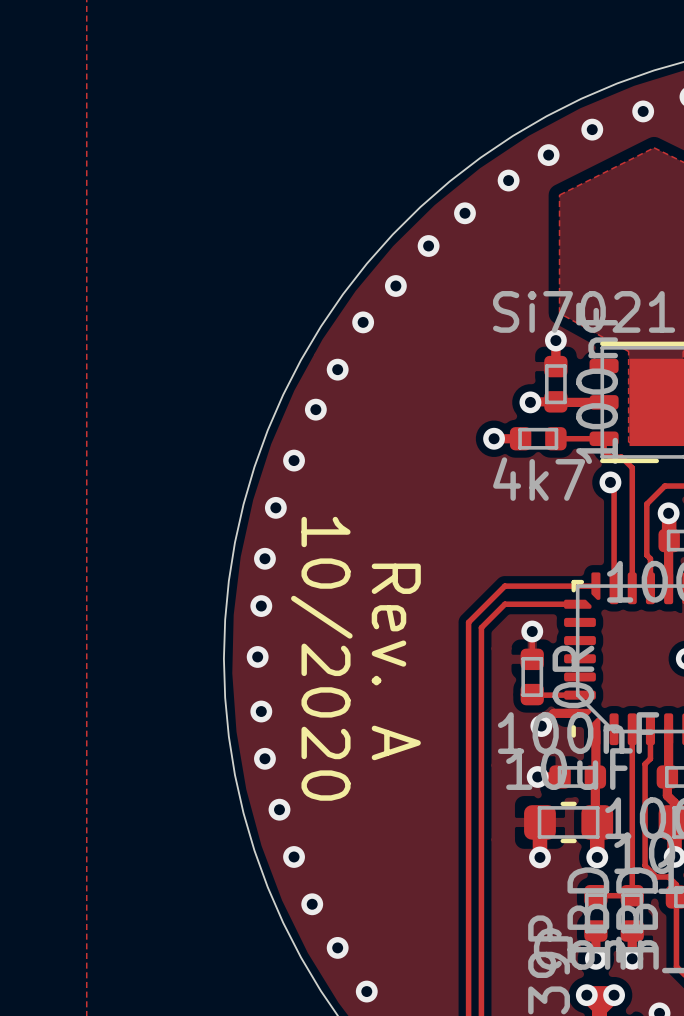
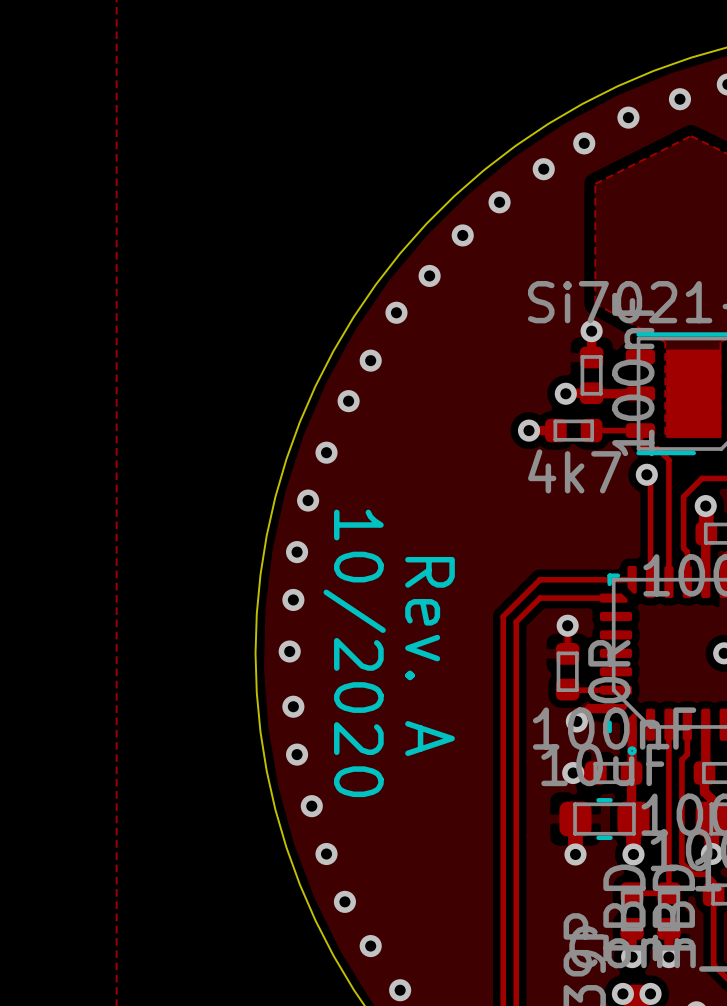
drawing: none -> [627, 746, 637, 756]

